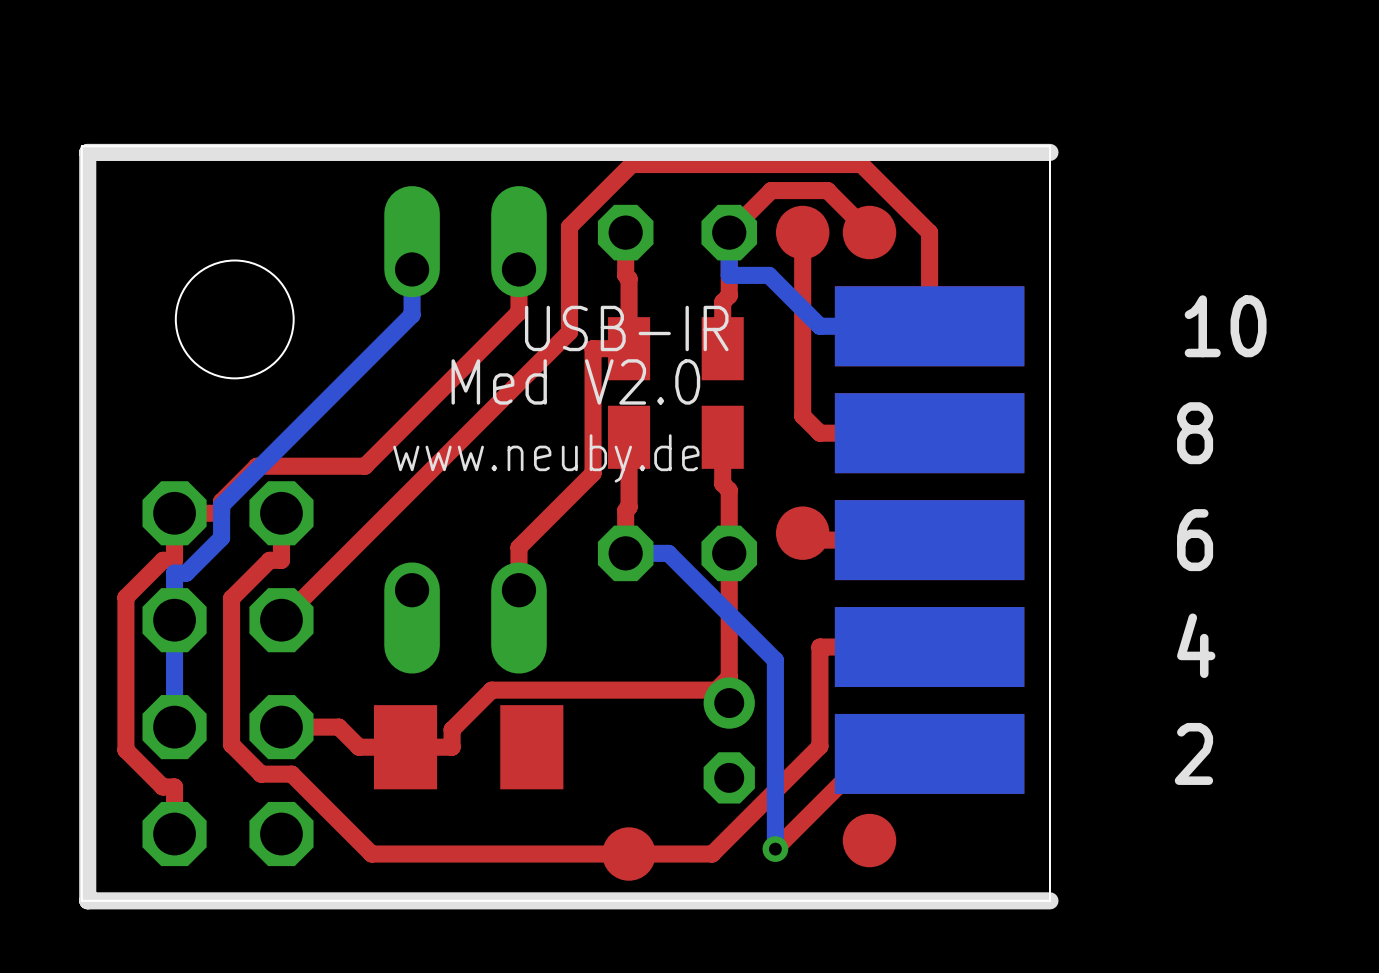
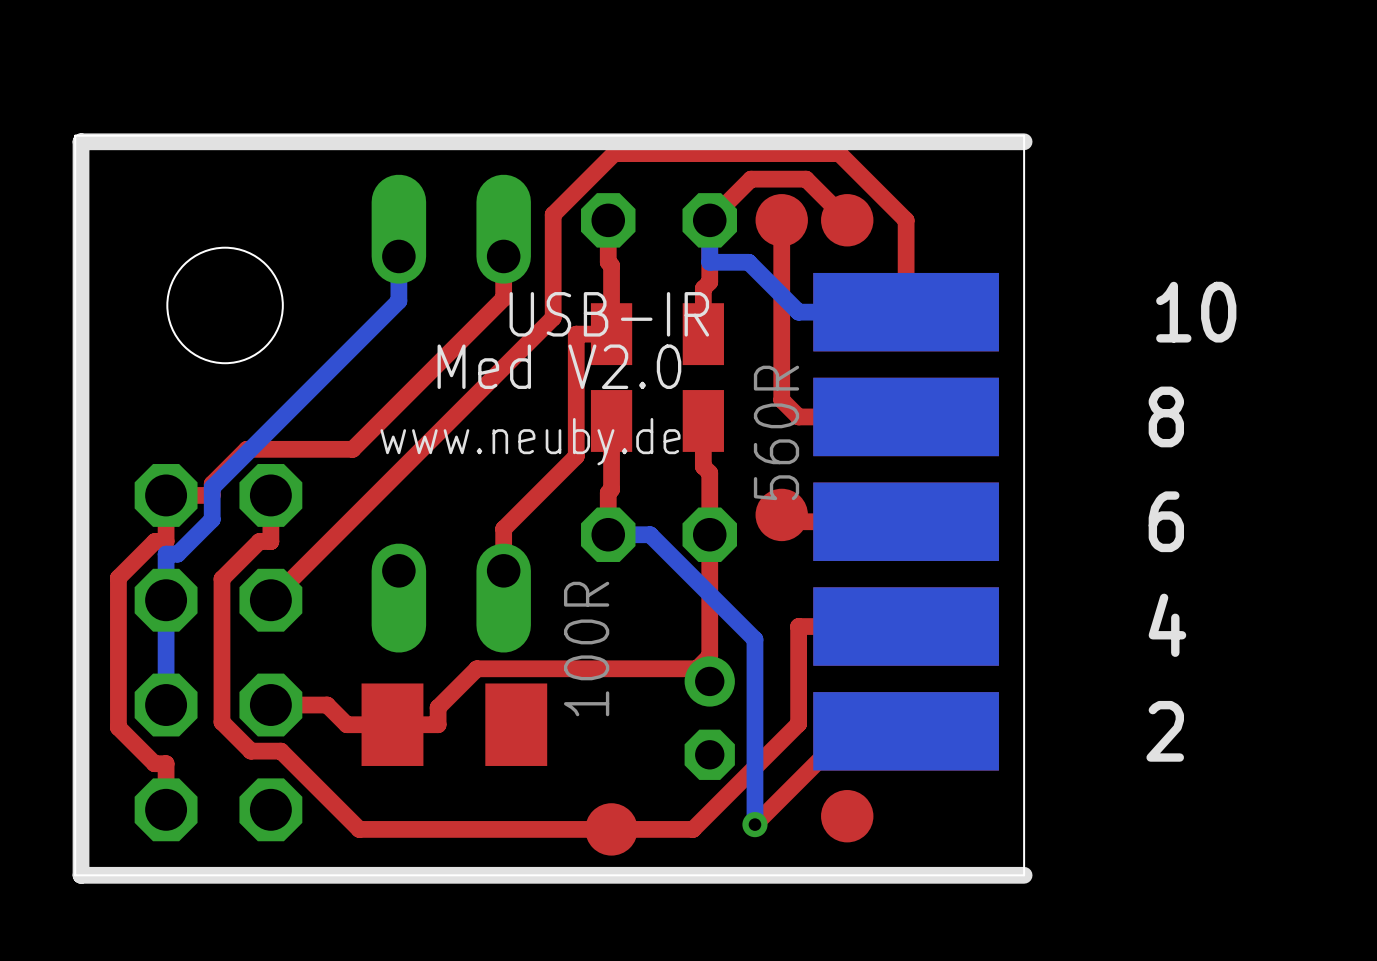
text: none -> 560R (776, 432)
text: none -> 100R (586, 649)

